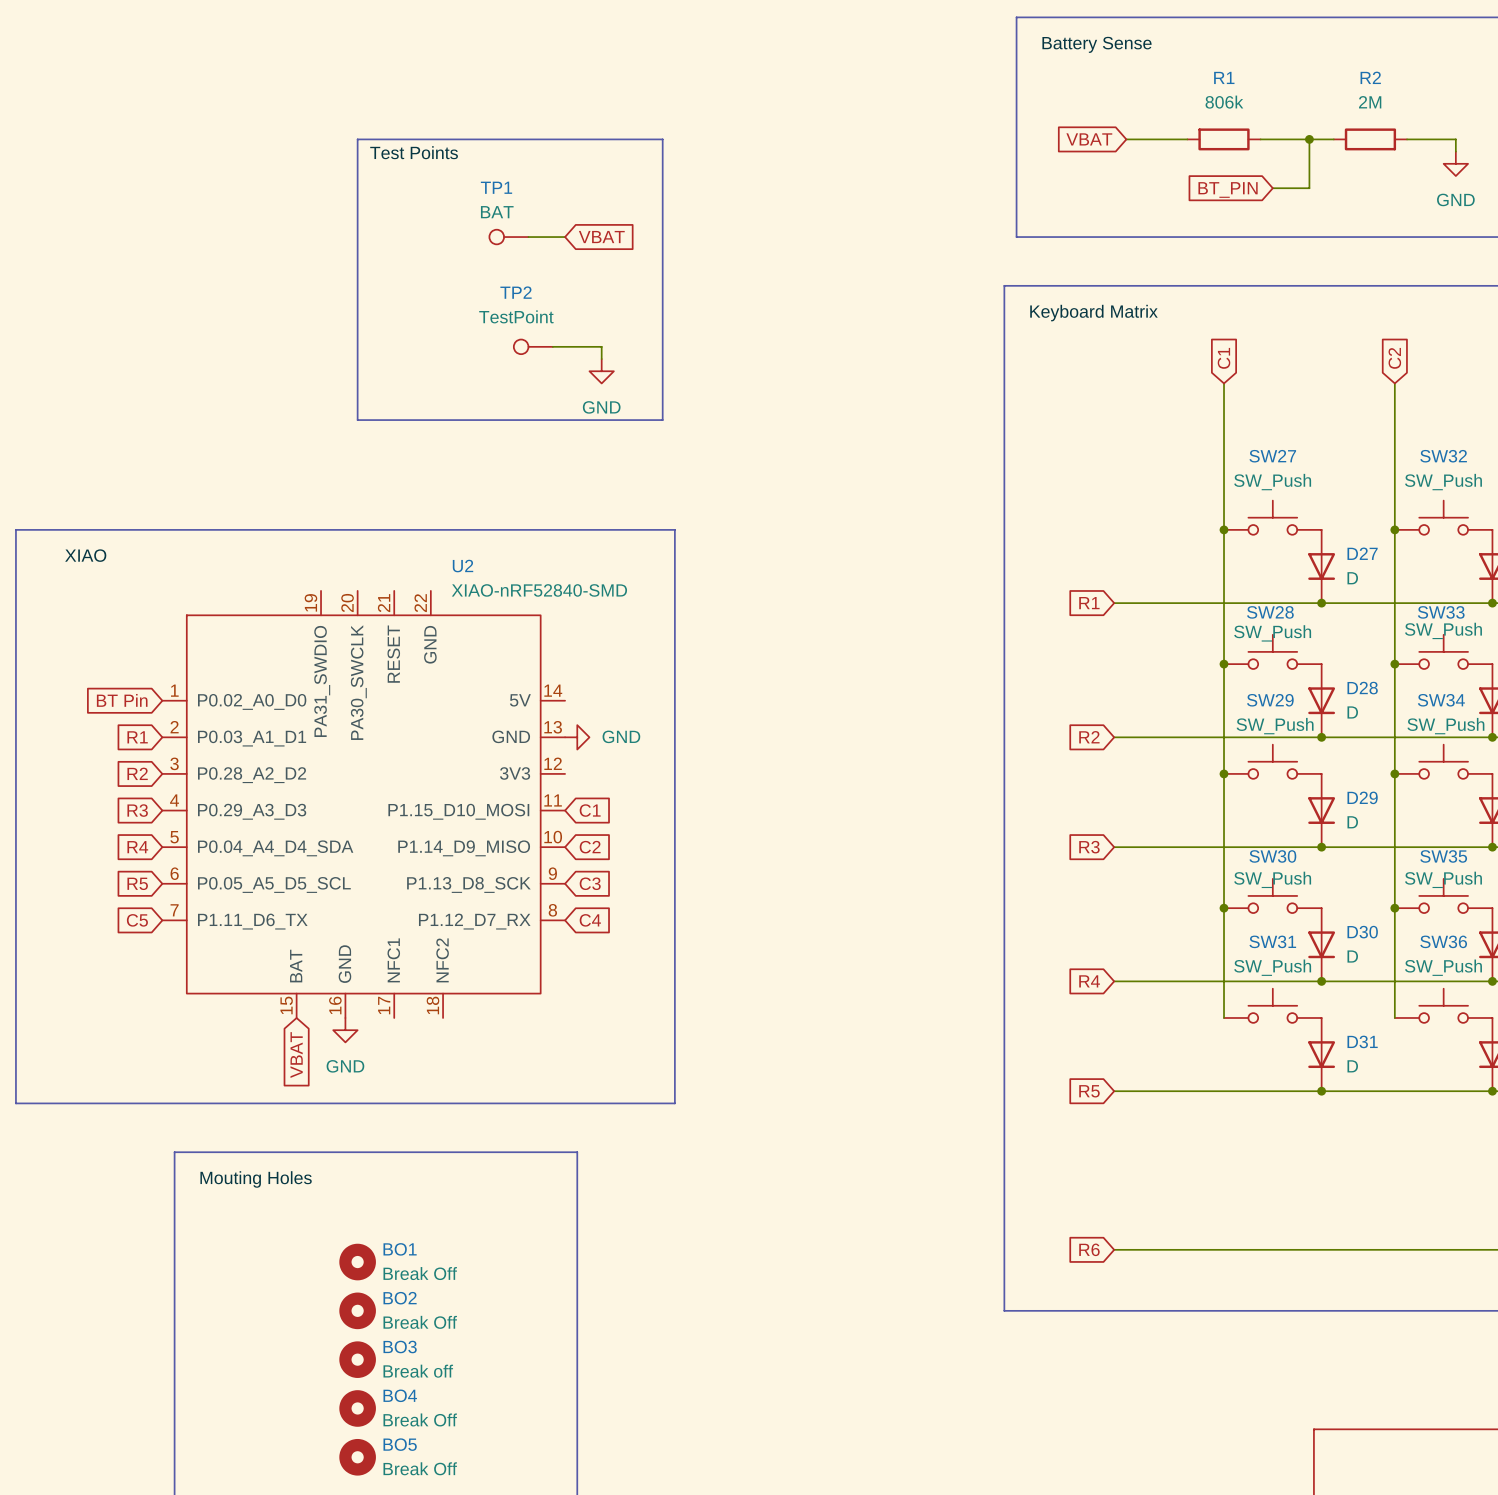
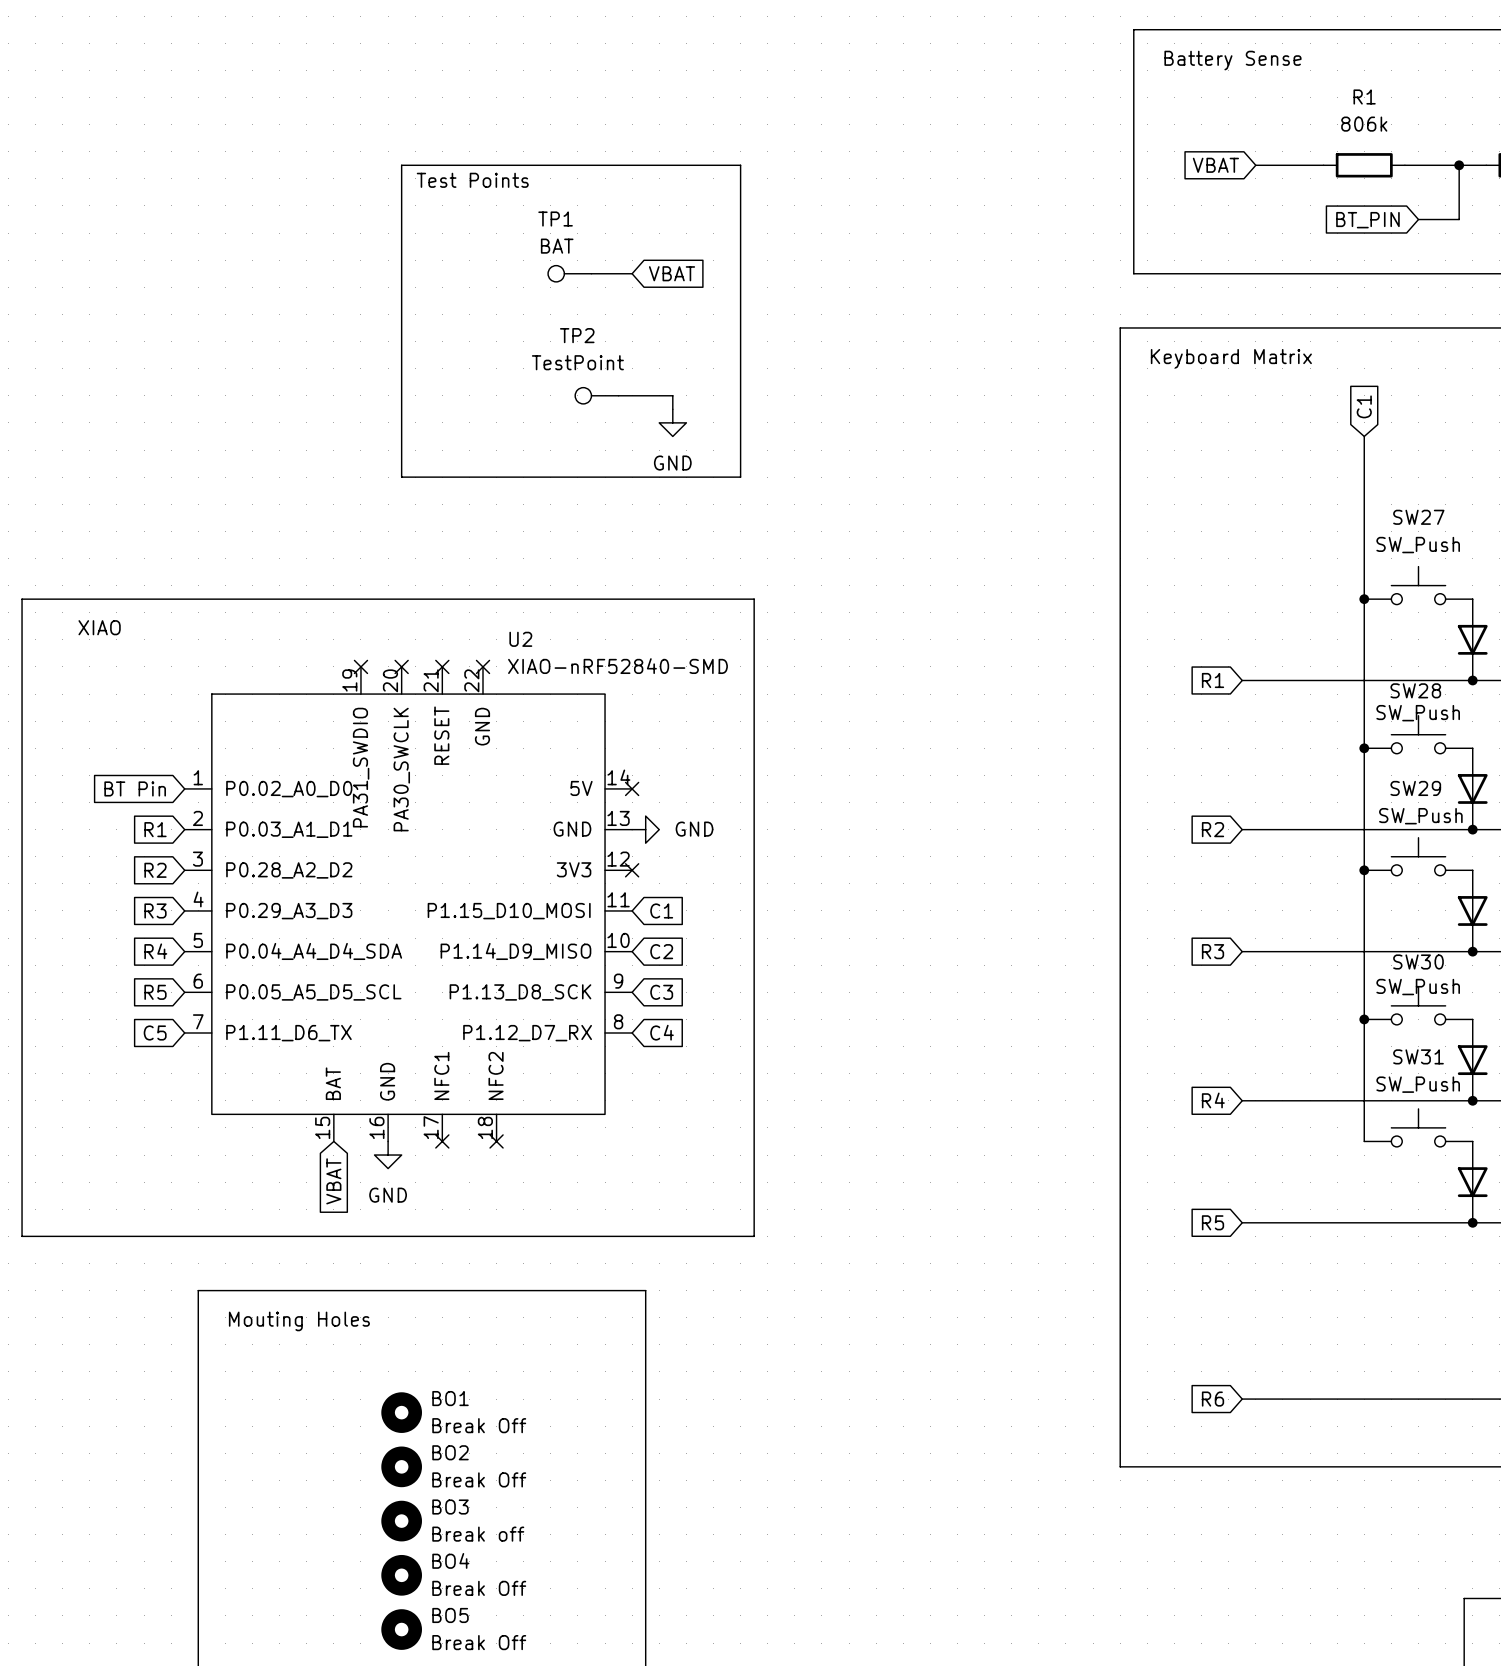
no-connect mark: none -> (360, 666)
no-connect mark: none -> (401, 666)
no-connect mark: none -> (442, 666)
no-connect mark: none -> (483, 666)
no-connect mark: none -> (632, 788)
no-connect mark: none -> (632, 870)
no-connect mark: none -> (442, 1141)
no-connect mark: none -> (496, 1141)

